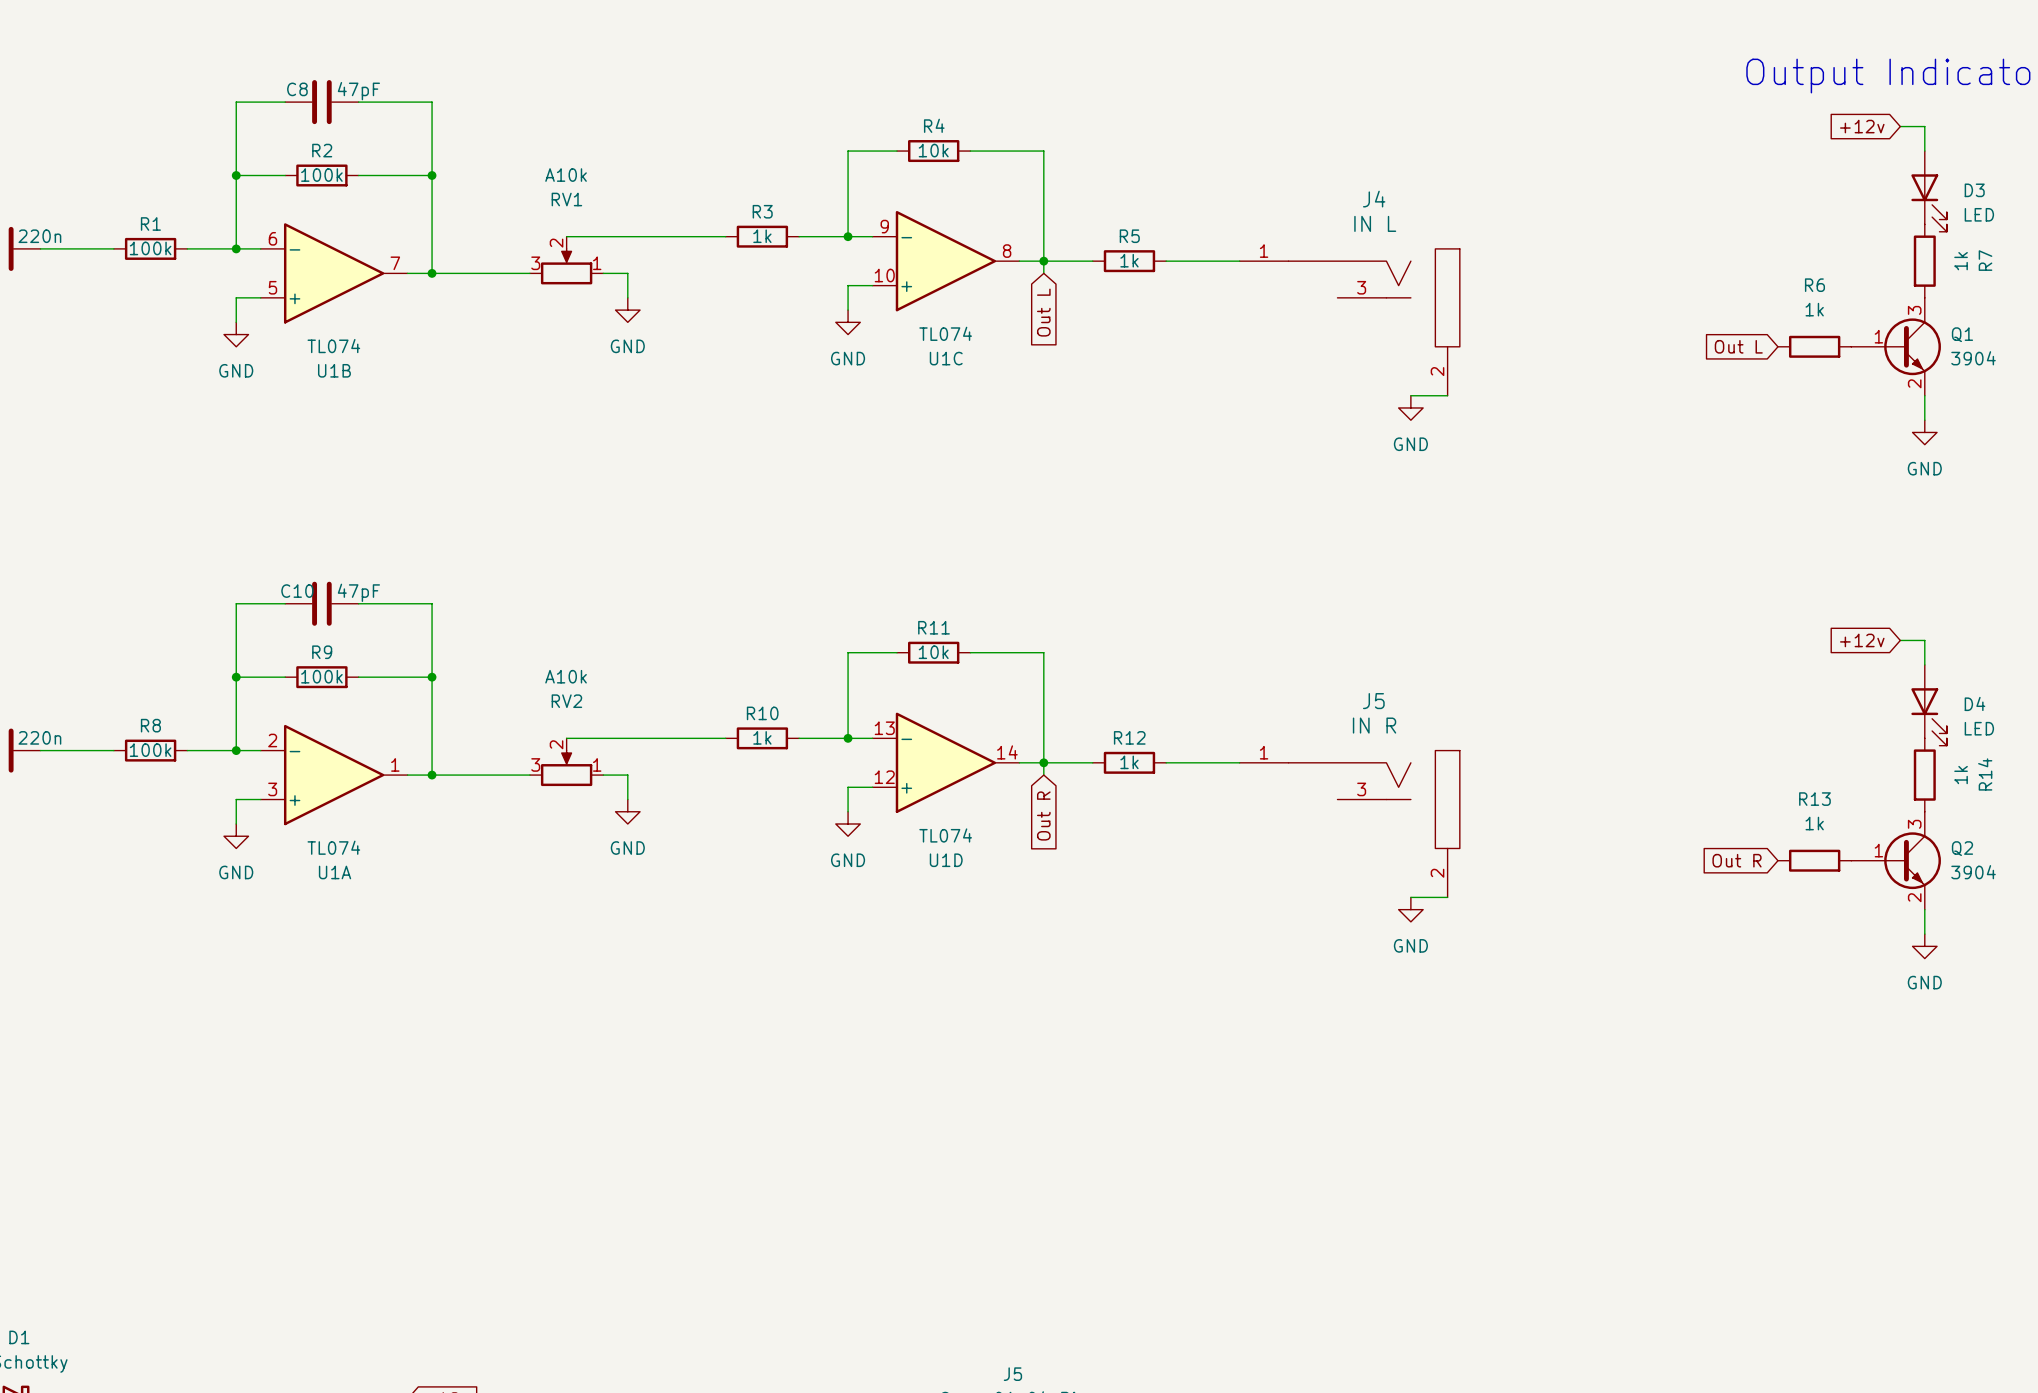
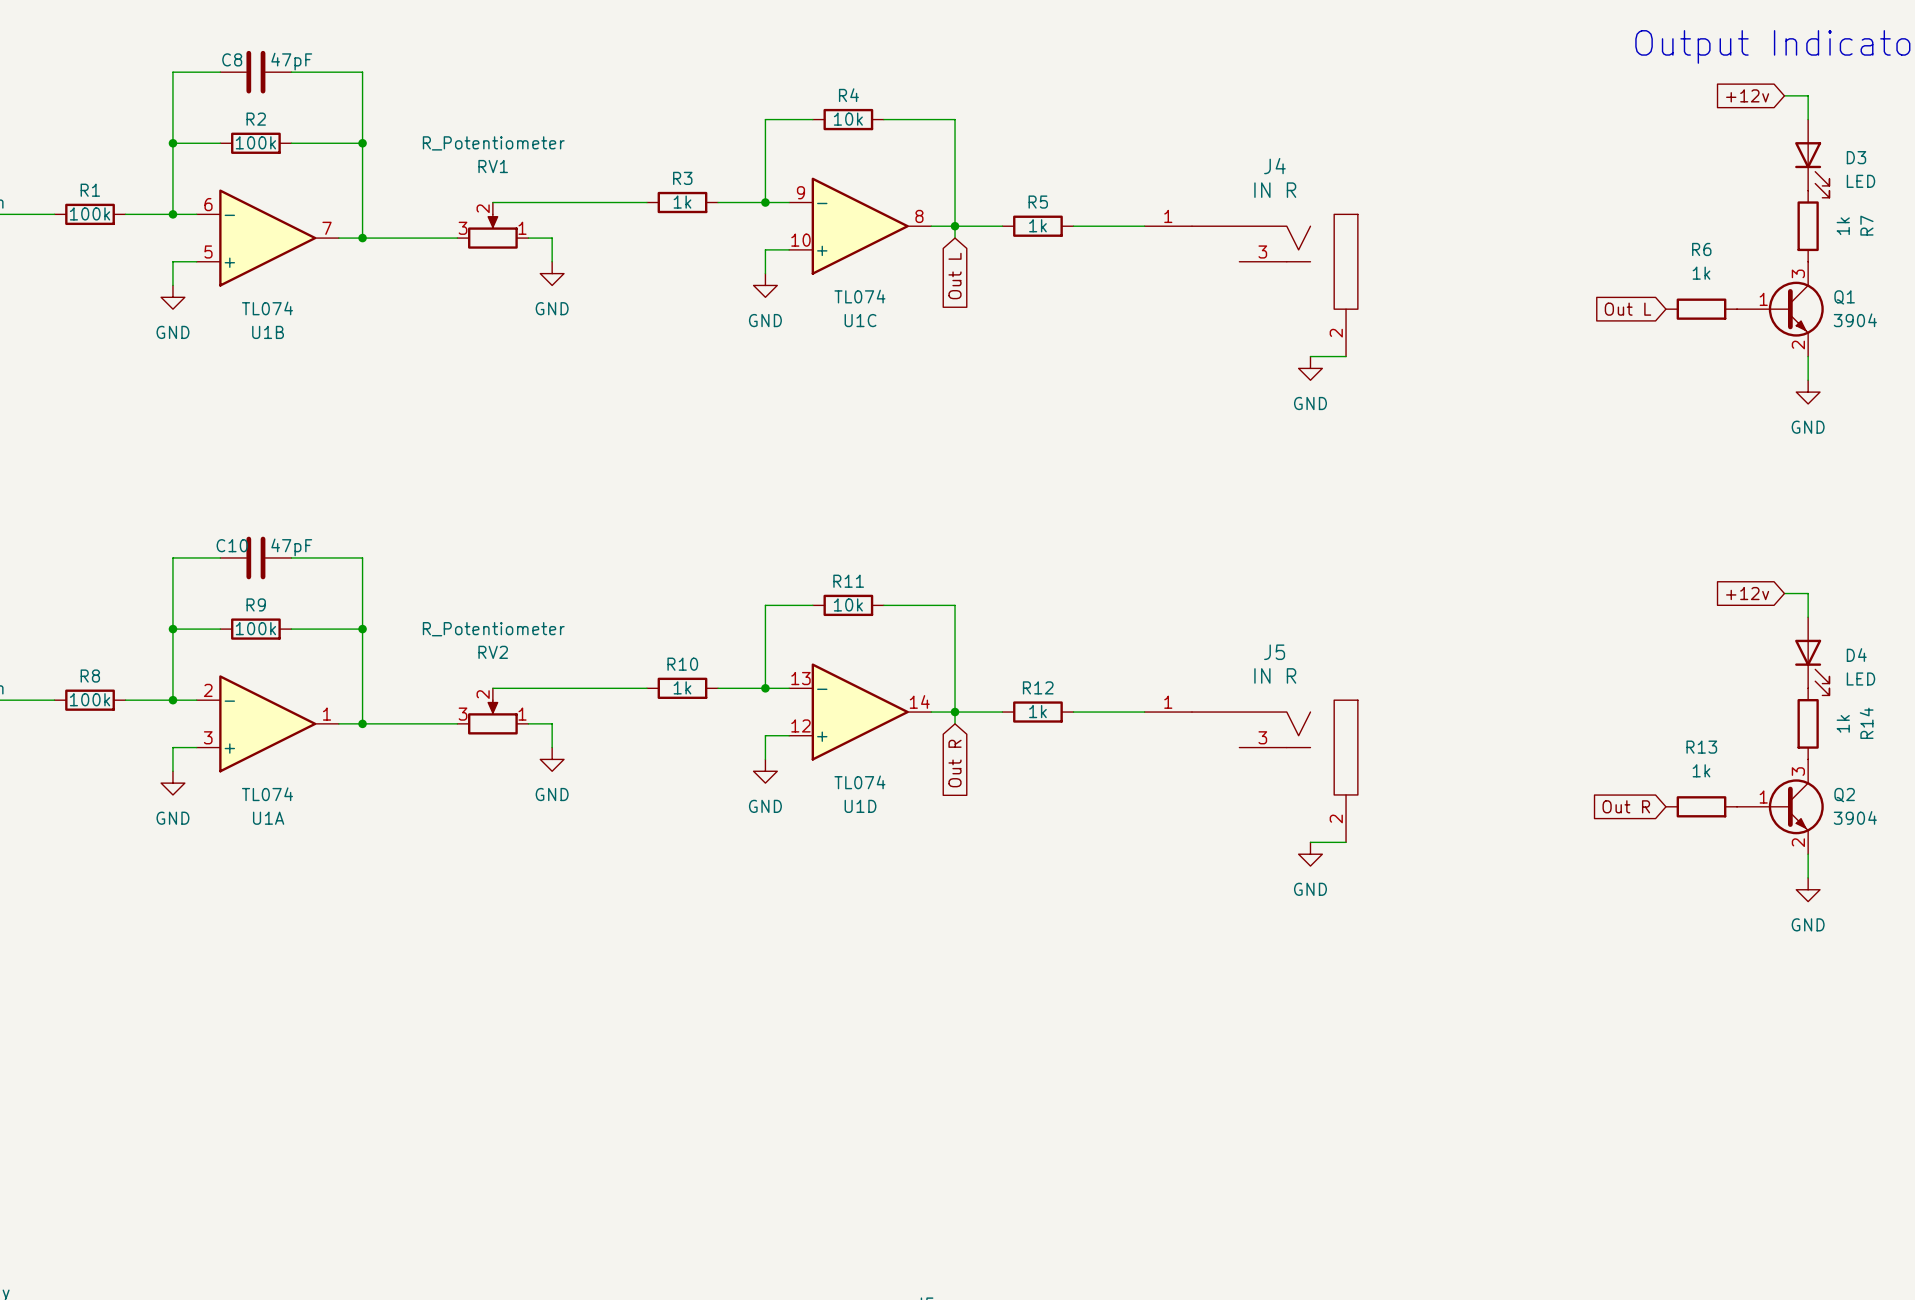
RV1 value: A10k (566, 175) -> R_Potentiometer (493, 143)
J4 value: IN L (1375, 223) -> IN R (1275, 190)
RV2 value: A10k (566, 676) -> R_Potentiometer (493, 629)

